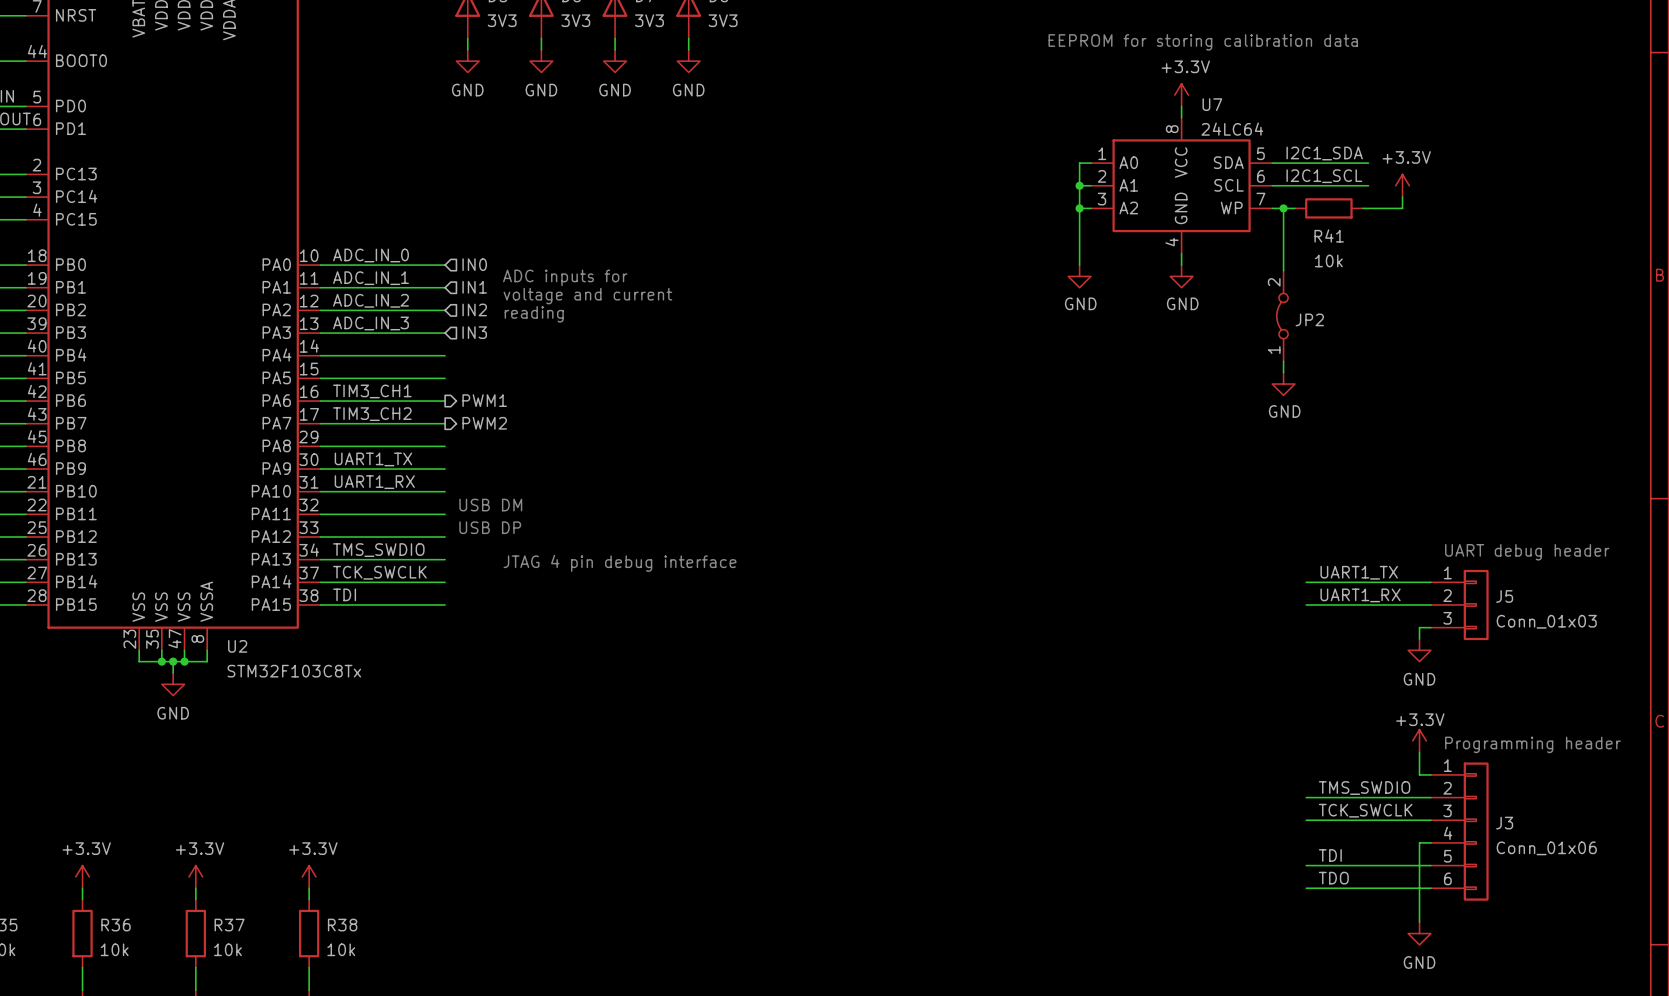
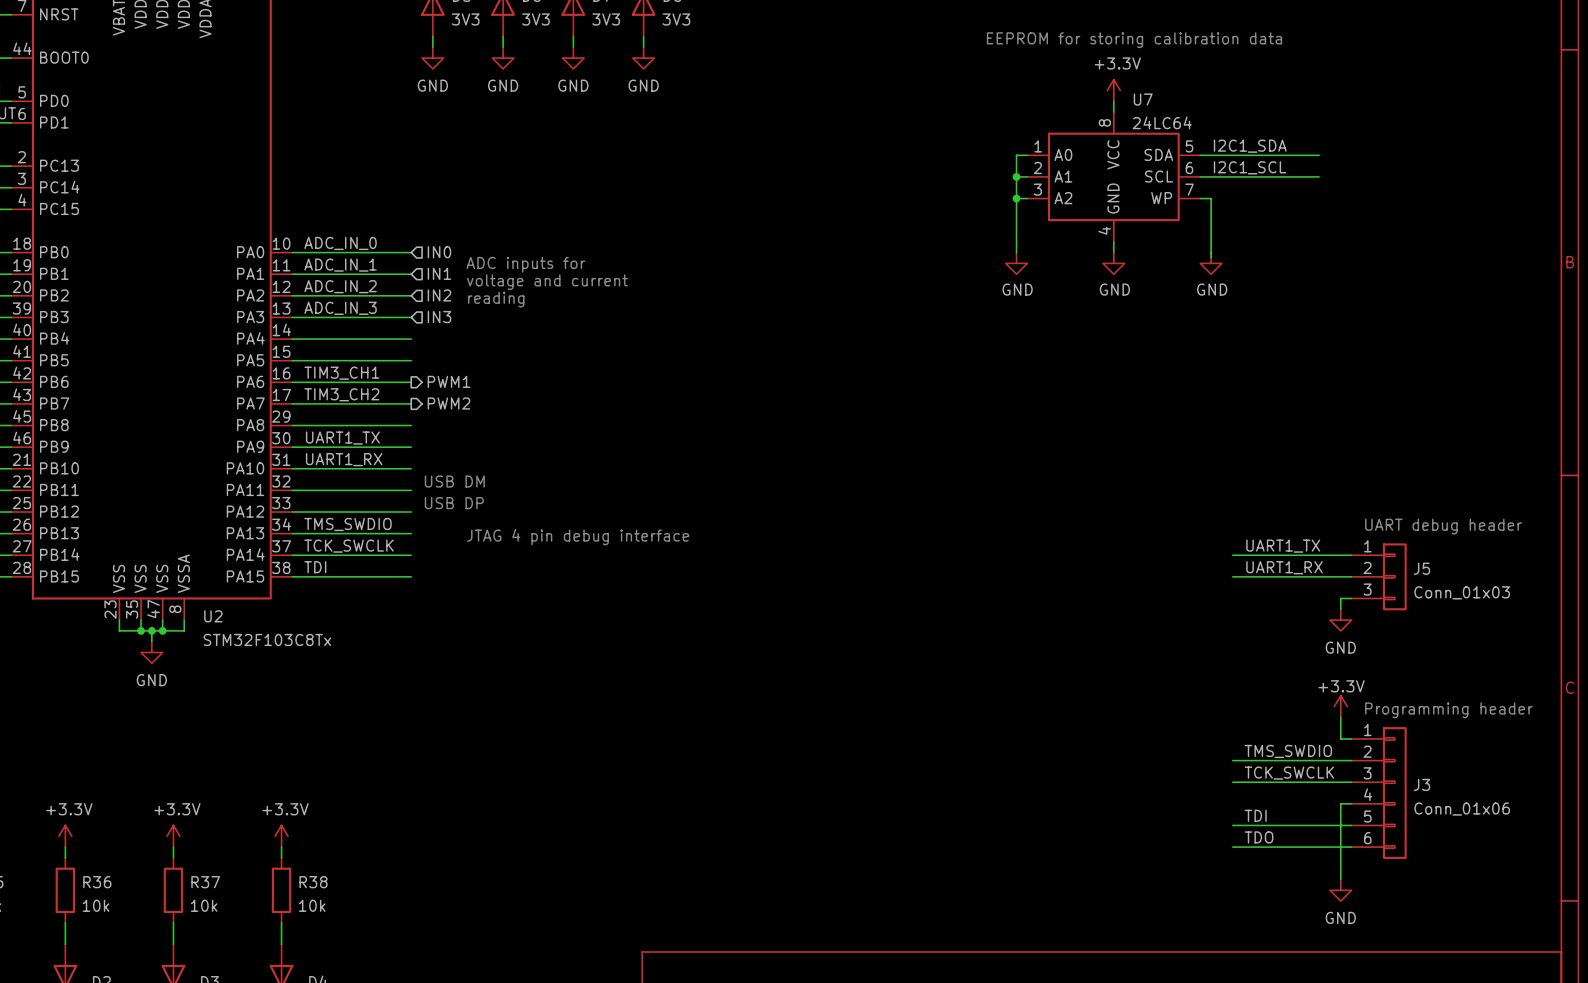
wire: none -> (1292, 155) (1319, 155)
wire: none -> (1292, 176) (1319, 176)
power symbol: +3.3V (1402, 185) -> none
wire: (1402, 197) (1402, 208) (1362, 208) -> none
wire: (1283, 208) (1294, 208) -> none
junction: (1283, 208) -> none
R41: 10k (1328, 208) -> none
JP2: (1282, 316) -> none
wire: (1283, 361) (1283, 372) -> none
power symbol position: GND (1283, 384) -> GND (1211, 263)

